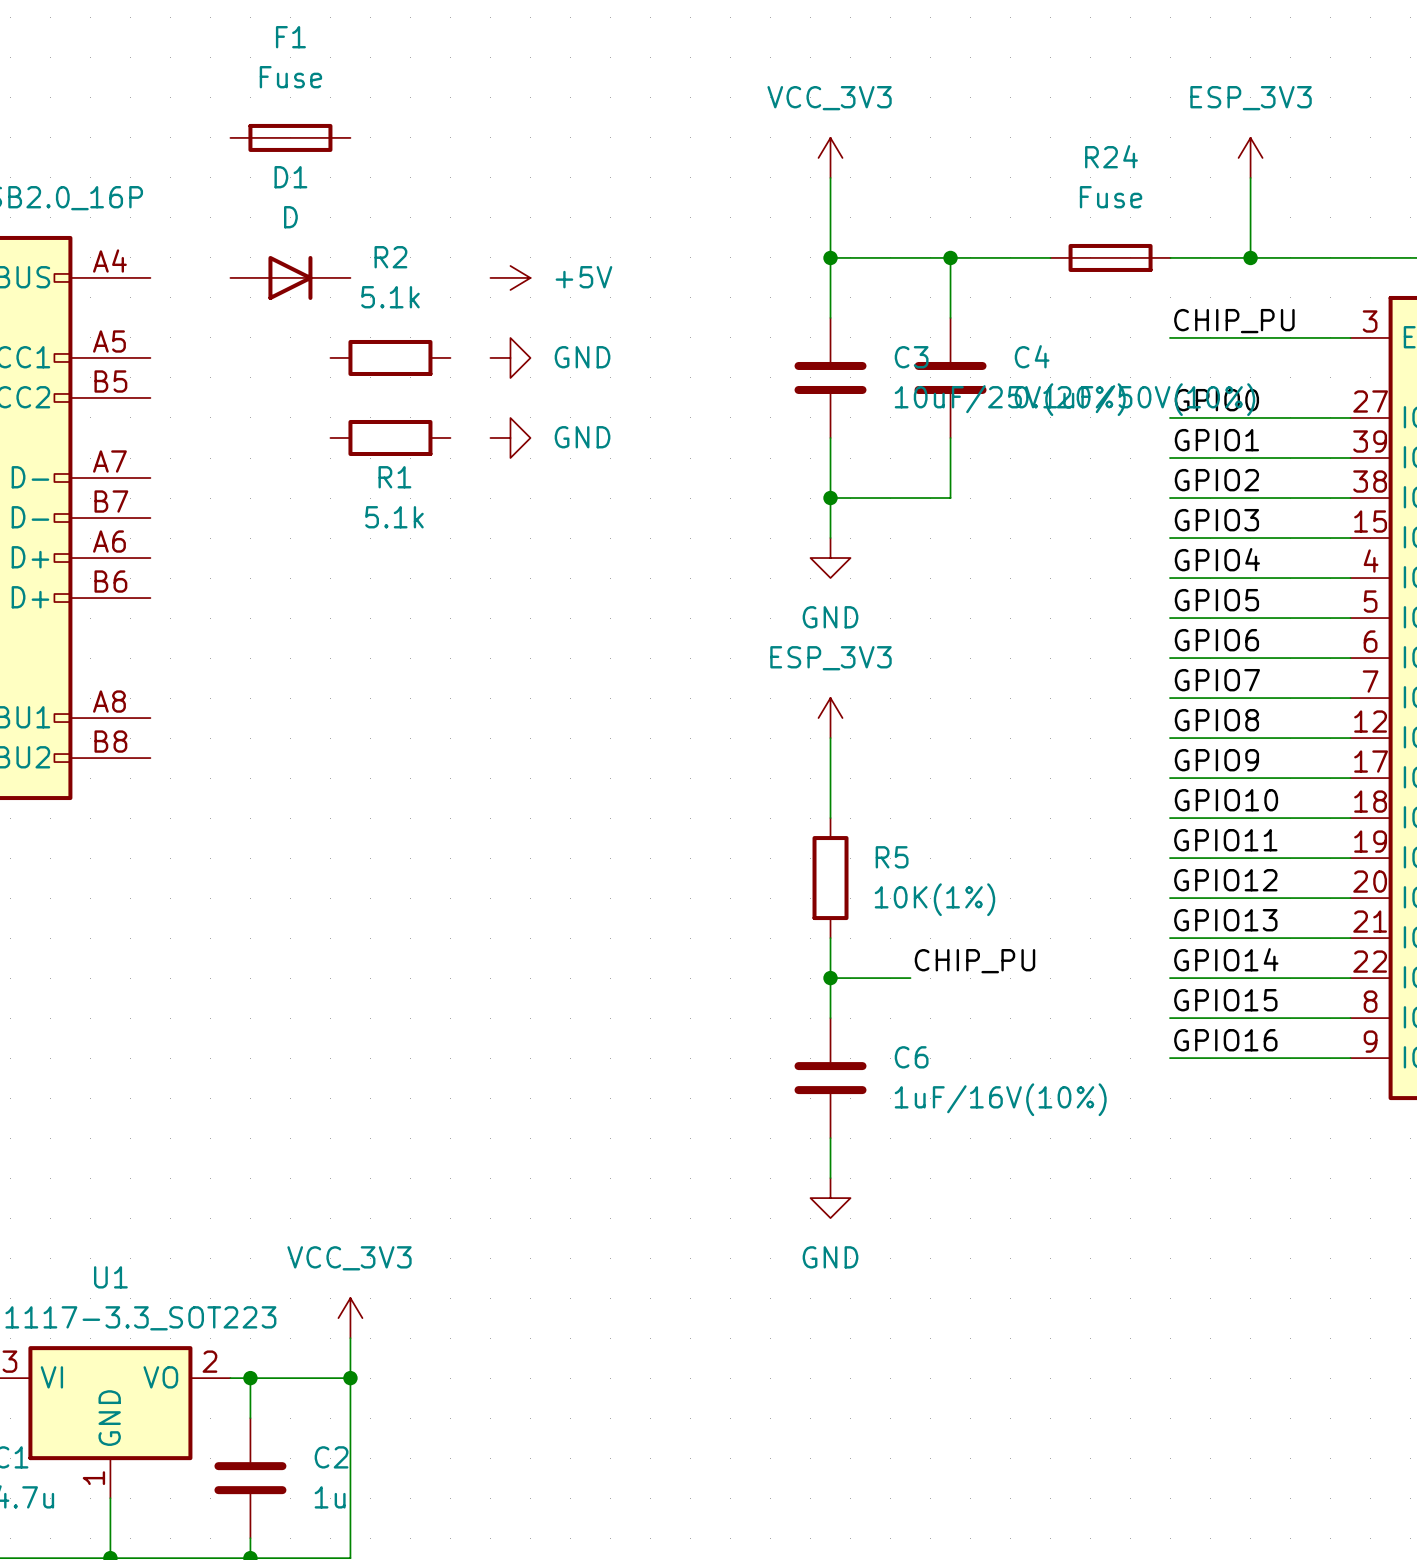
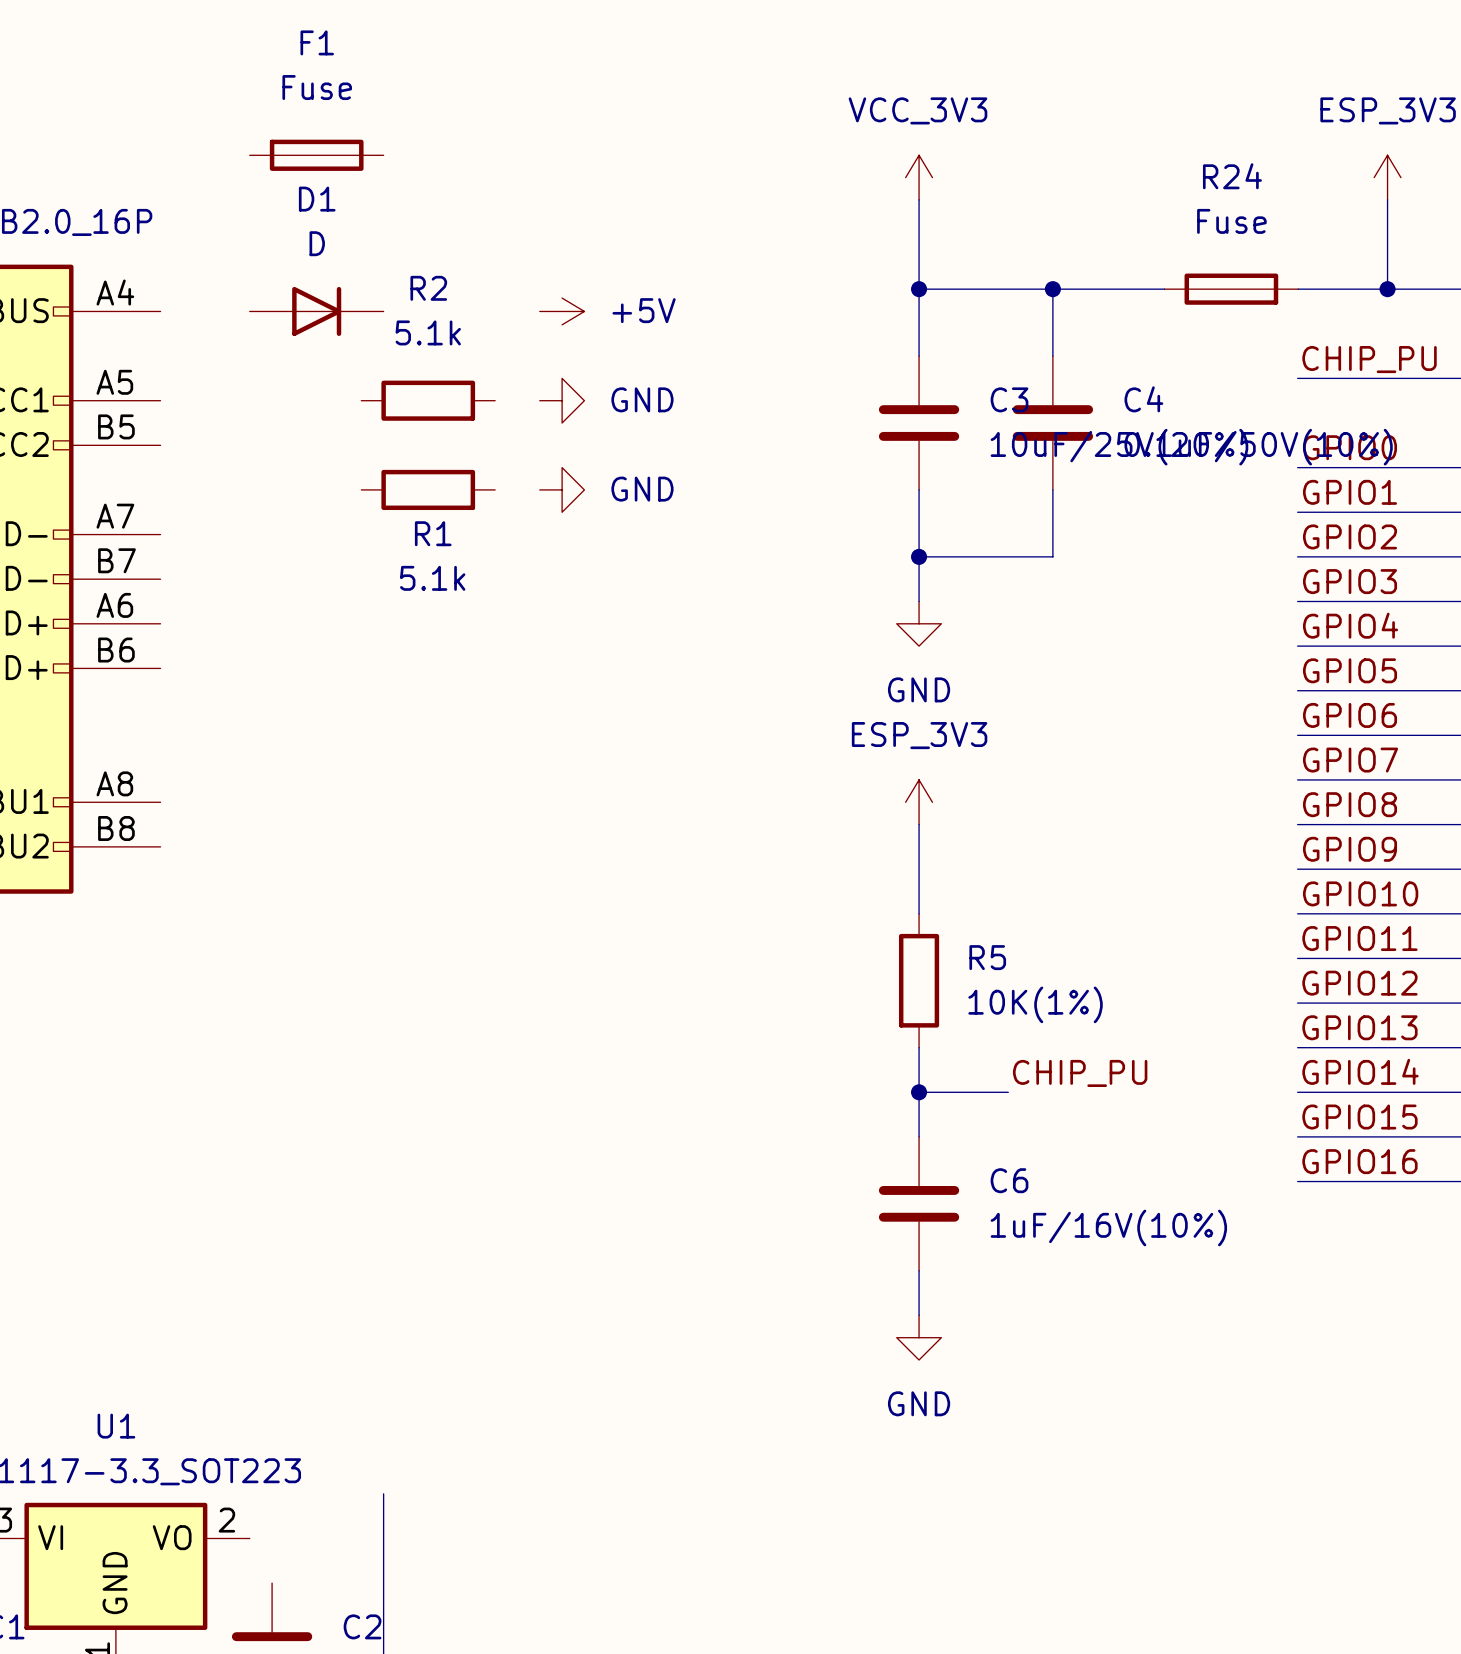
power symbol: VCC_3V3 (350, 1318) -> none
wire: (230, 1378) (350, 1378) -> none
wire: (250, 1378) (250, 1418) -> none
junction: (250, 1378) -> none
junction: (350, 1378) -> none

